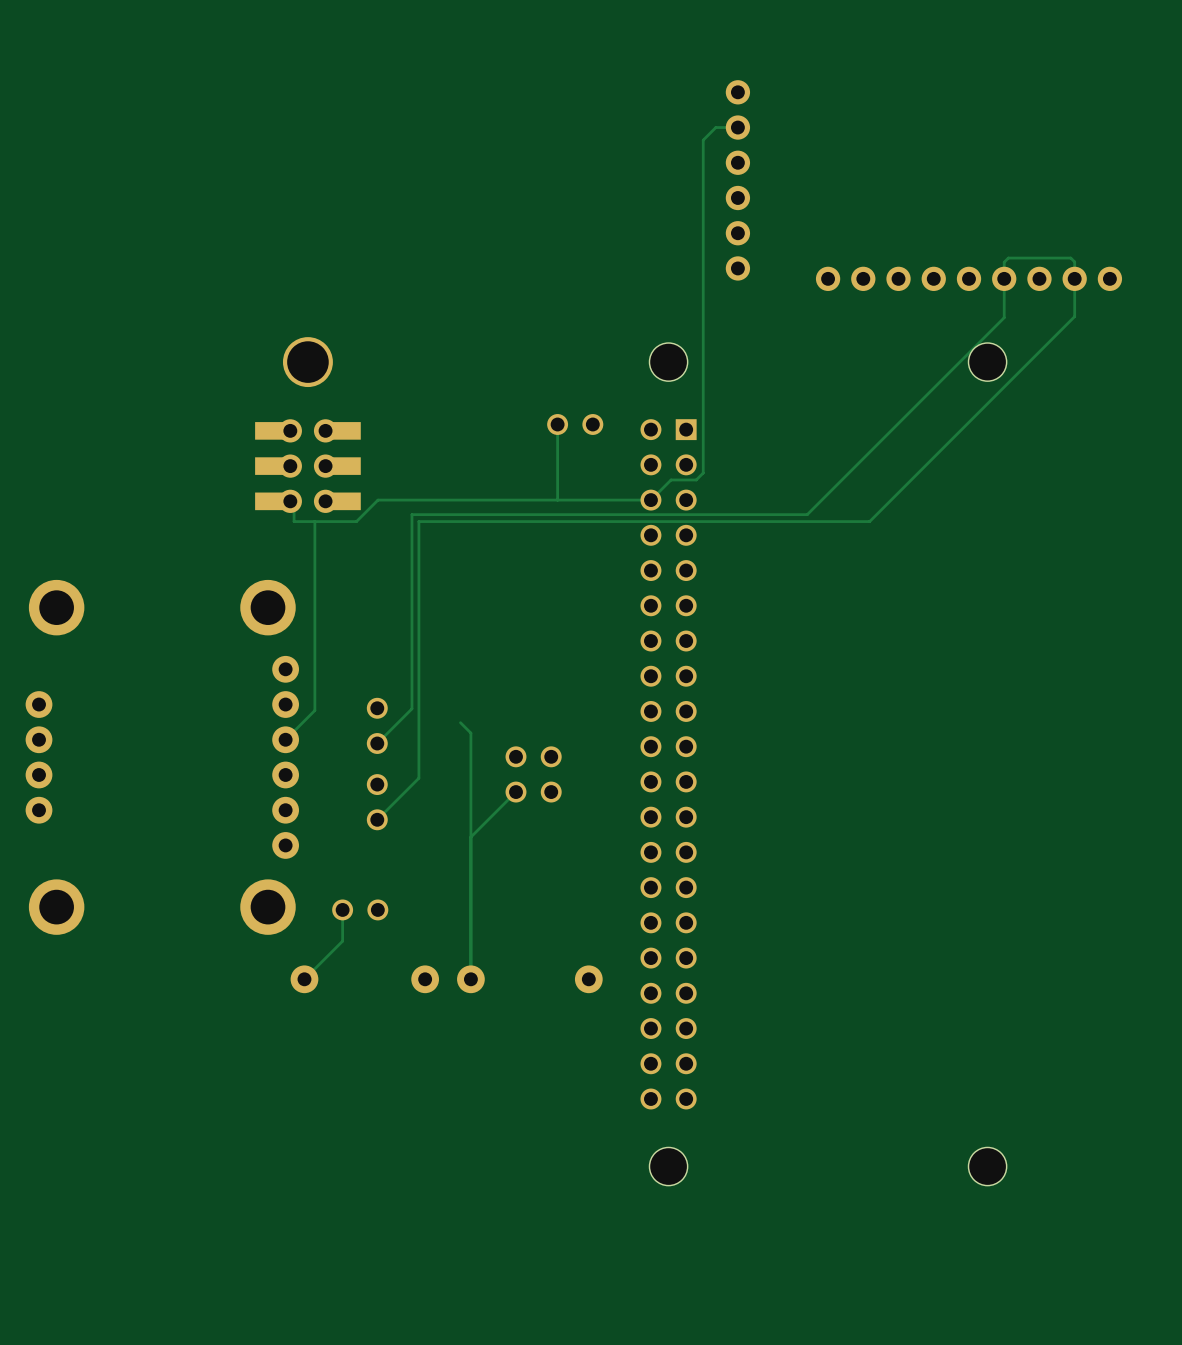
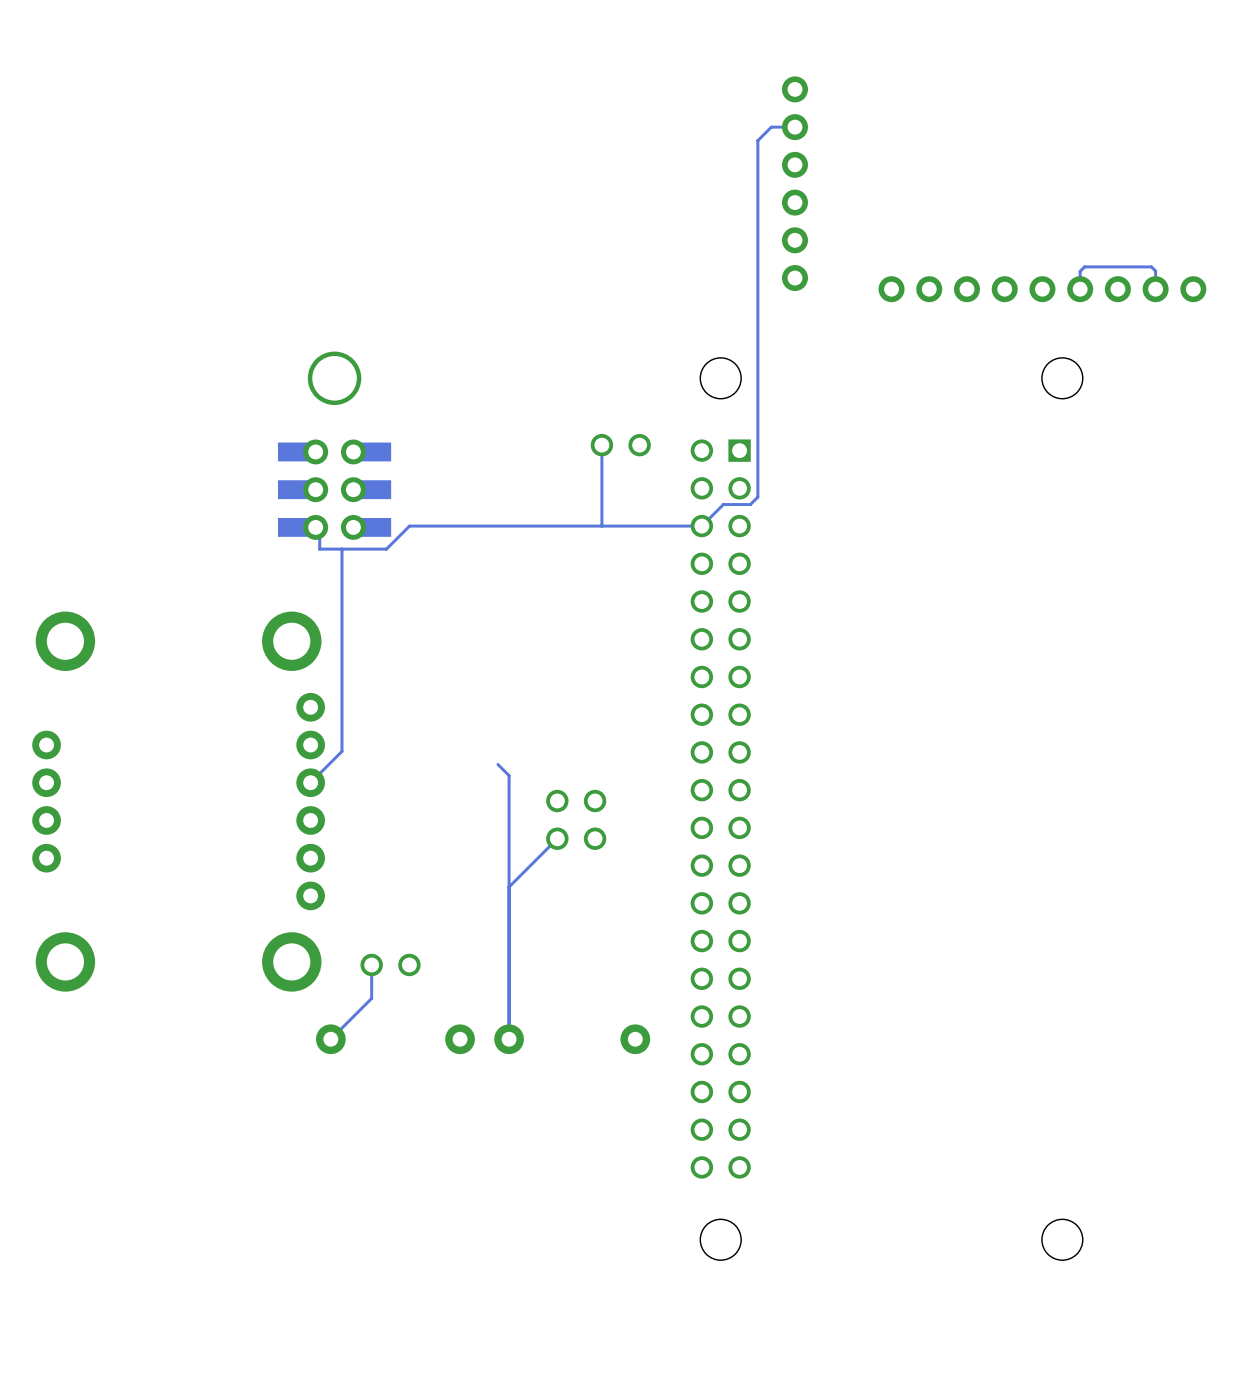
track: (1004, 278) (1004, 317) (807, 514) (411, 514) (411, 708) (377, 743) -> none
track: (1074, 278) (1074, 316) (869, 521) (418, 521) (418, 778) (377, 819) -> none
part: (377, 708) -> none
part: (377, 743) -> none
part: (377, 784) -> none
part: (377, 819) -> none

